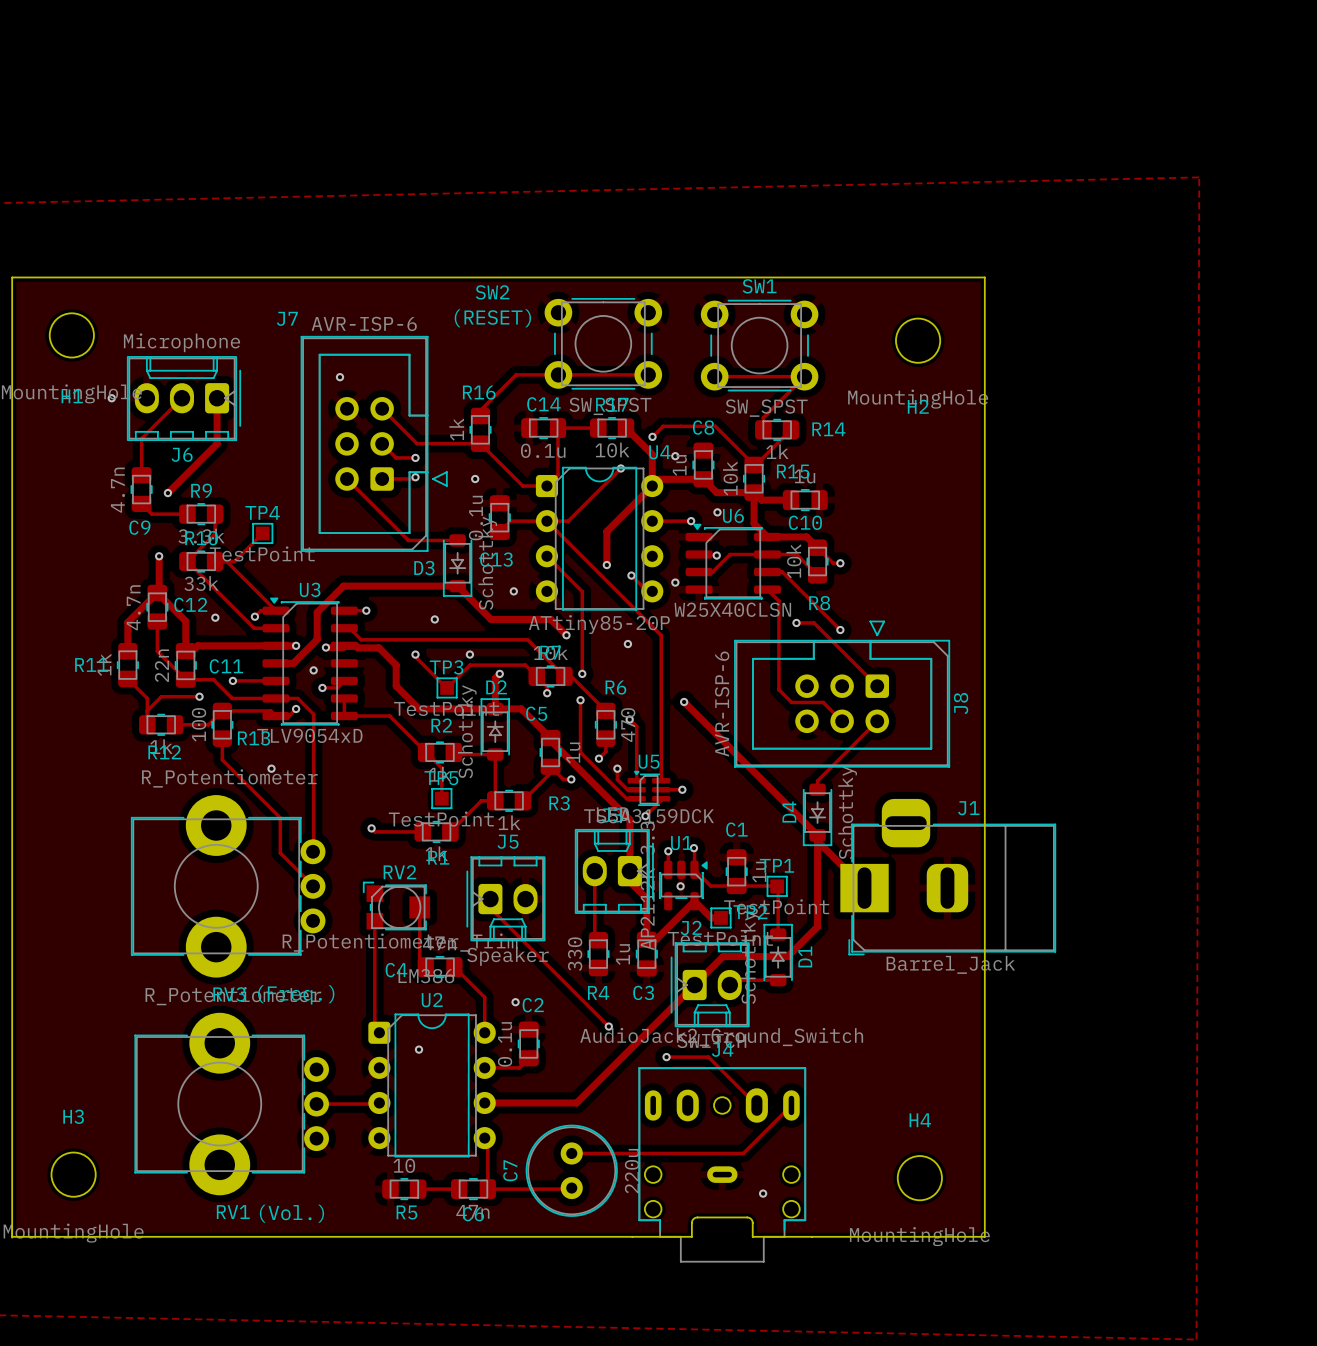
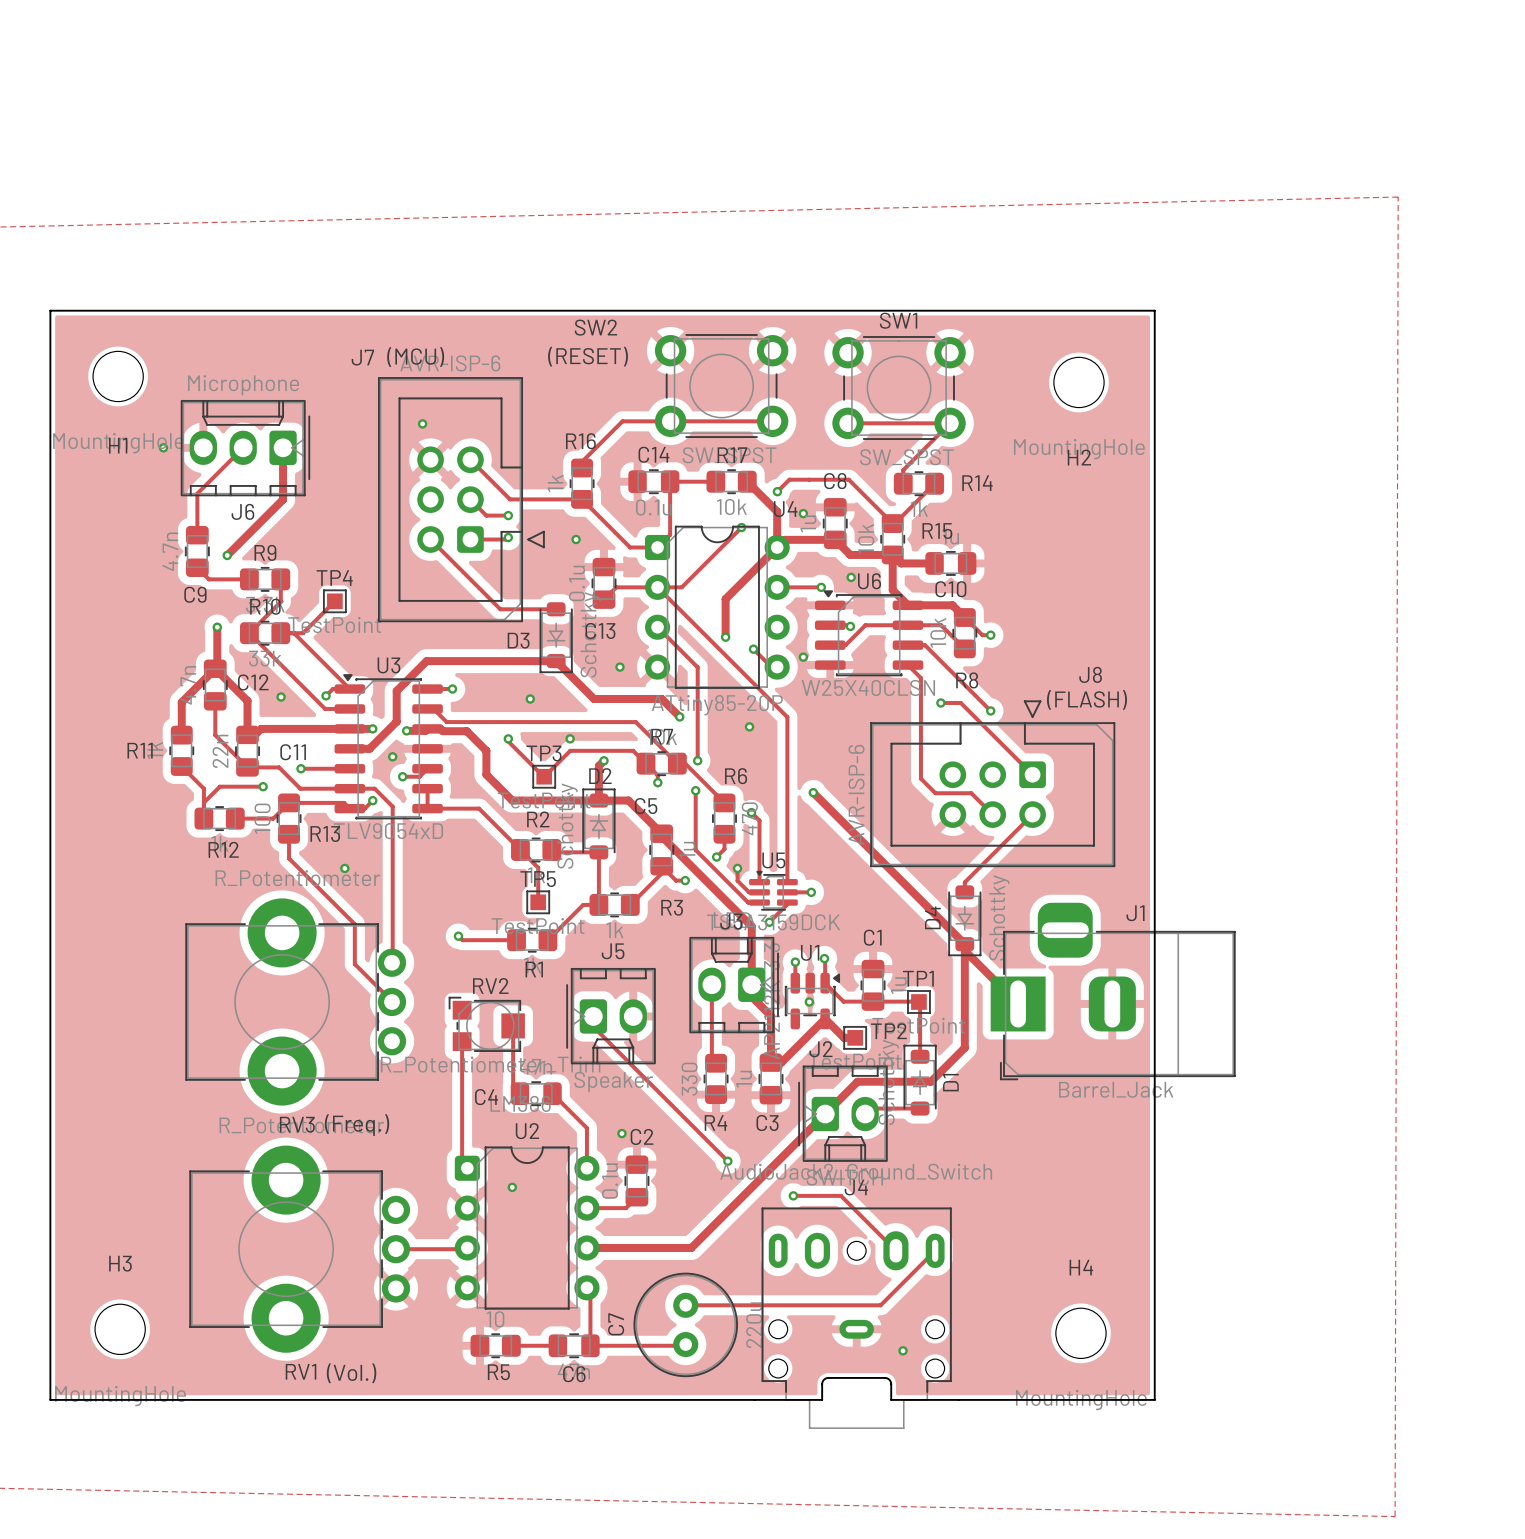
text: none -> (MCU) (415, 357)
text: none -> (FLASH) (1086, 699)
J8 name rotation: 0° (961, 703) -> 90° clockwise (1090, 674)
J8 name position: J8 (961, 703) -> J8 (1090, 674)

